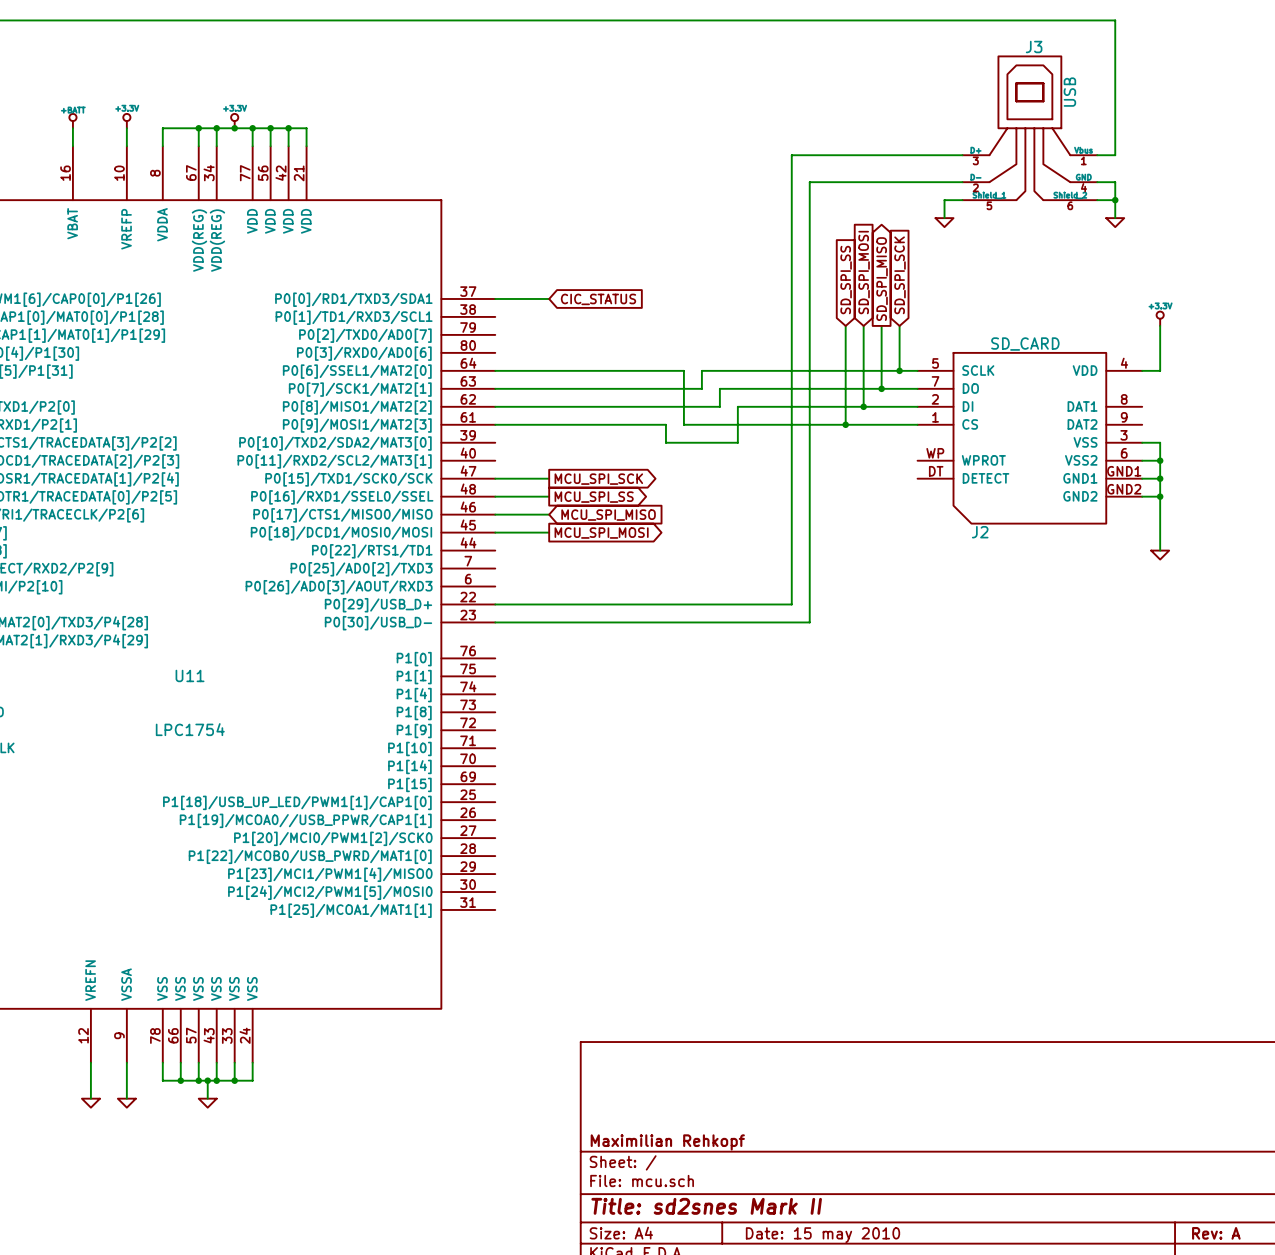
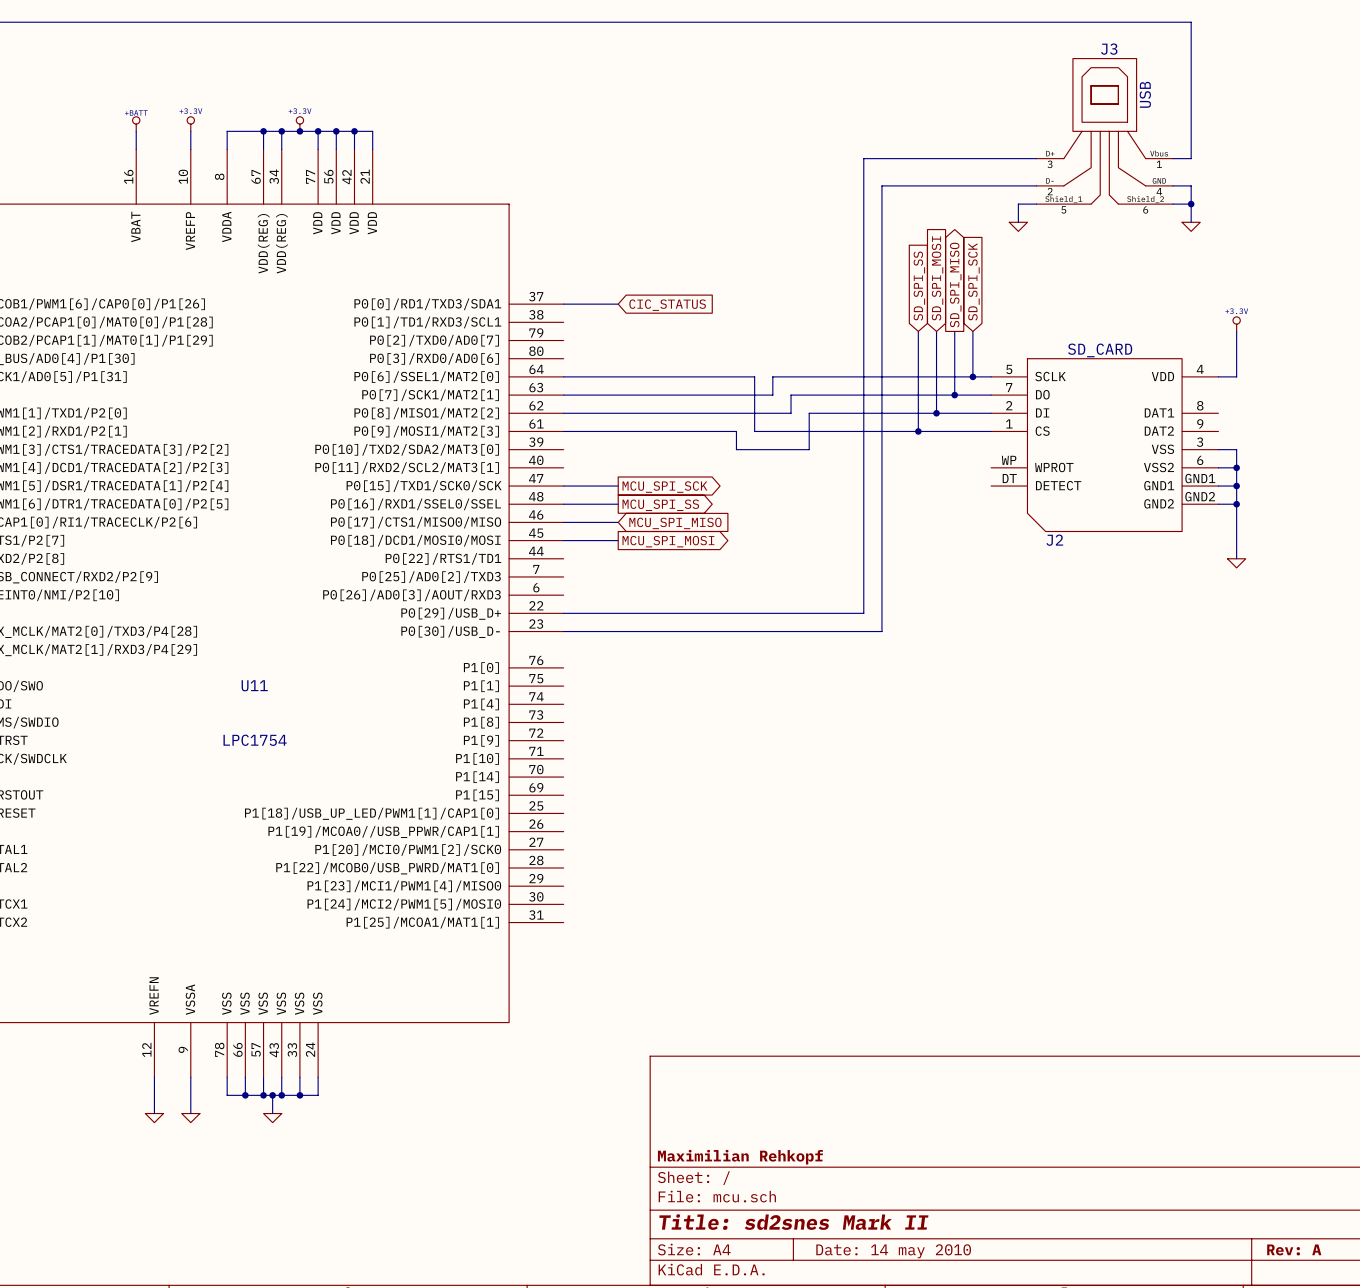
title block: Date: 15 may 2010 (822, 1235) -> Date: 14 may 2010 (893, 1251)

